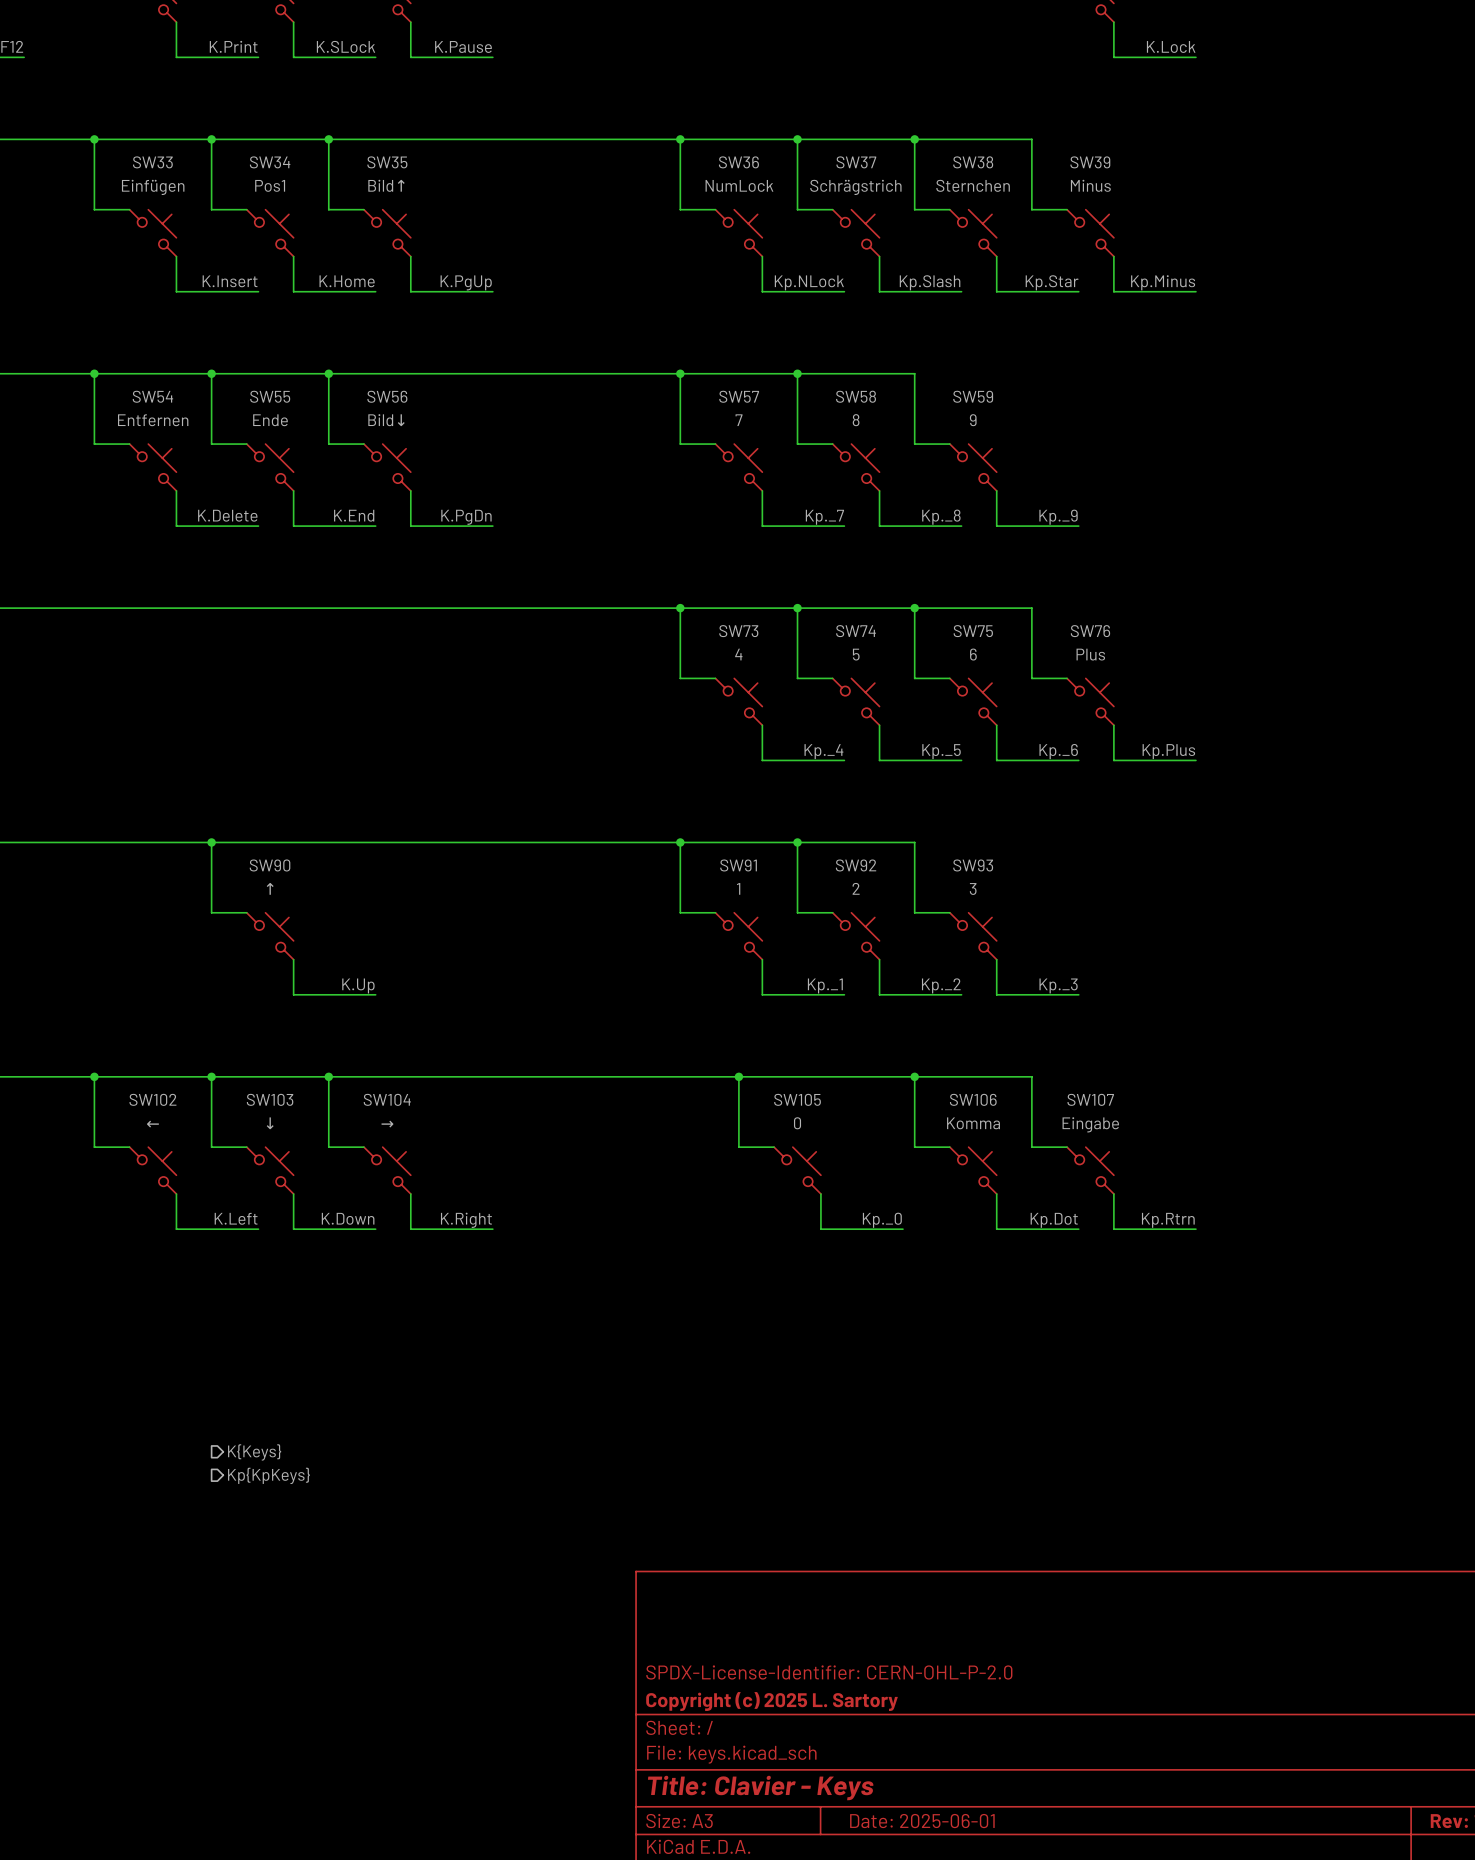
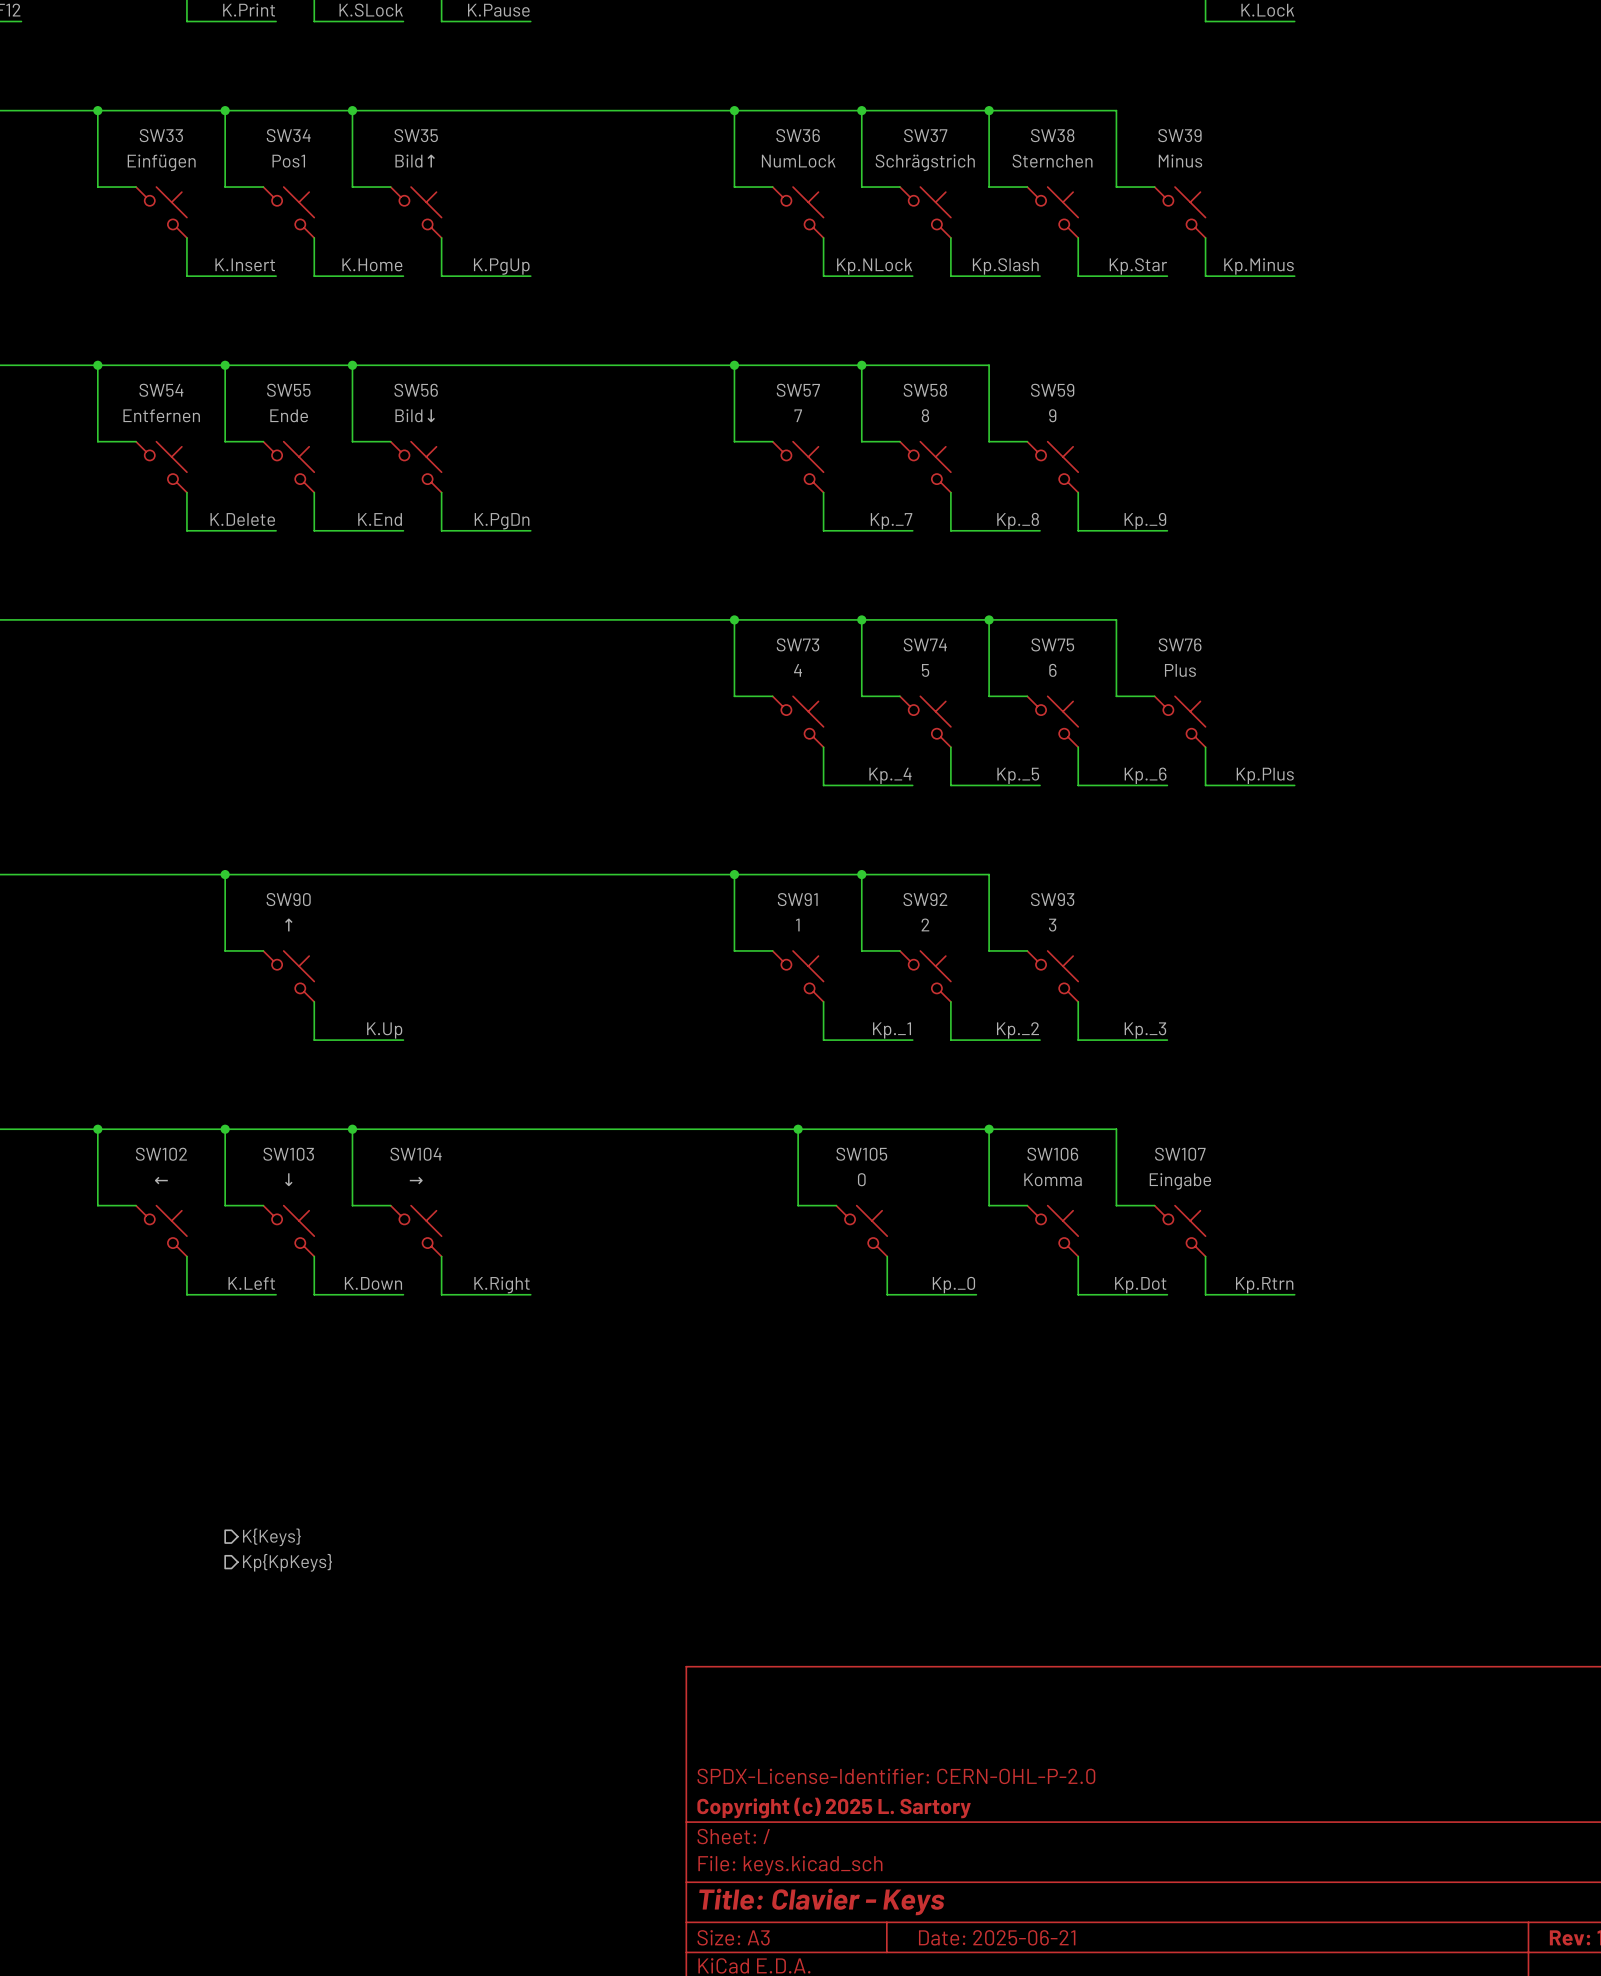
title block: Date: 2025-06-01 (922, 1821) -> Date: 2025-06-21 (997, 1937)

